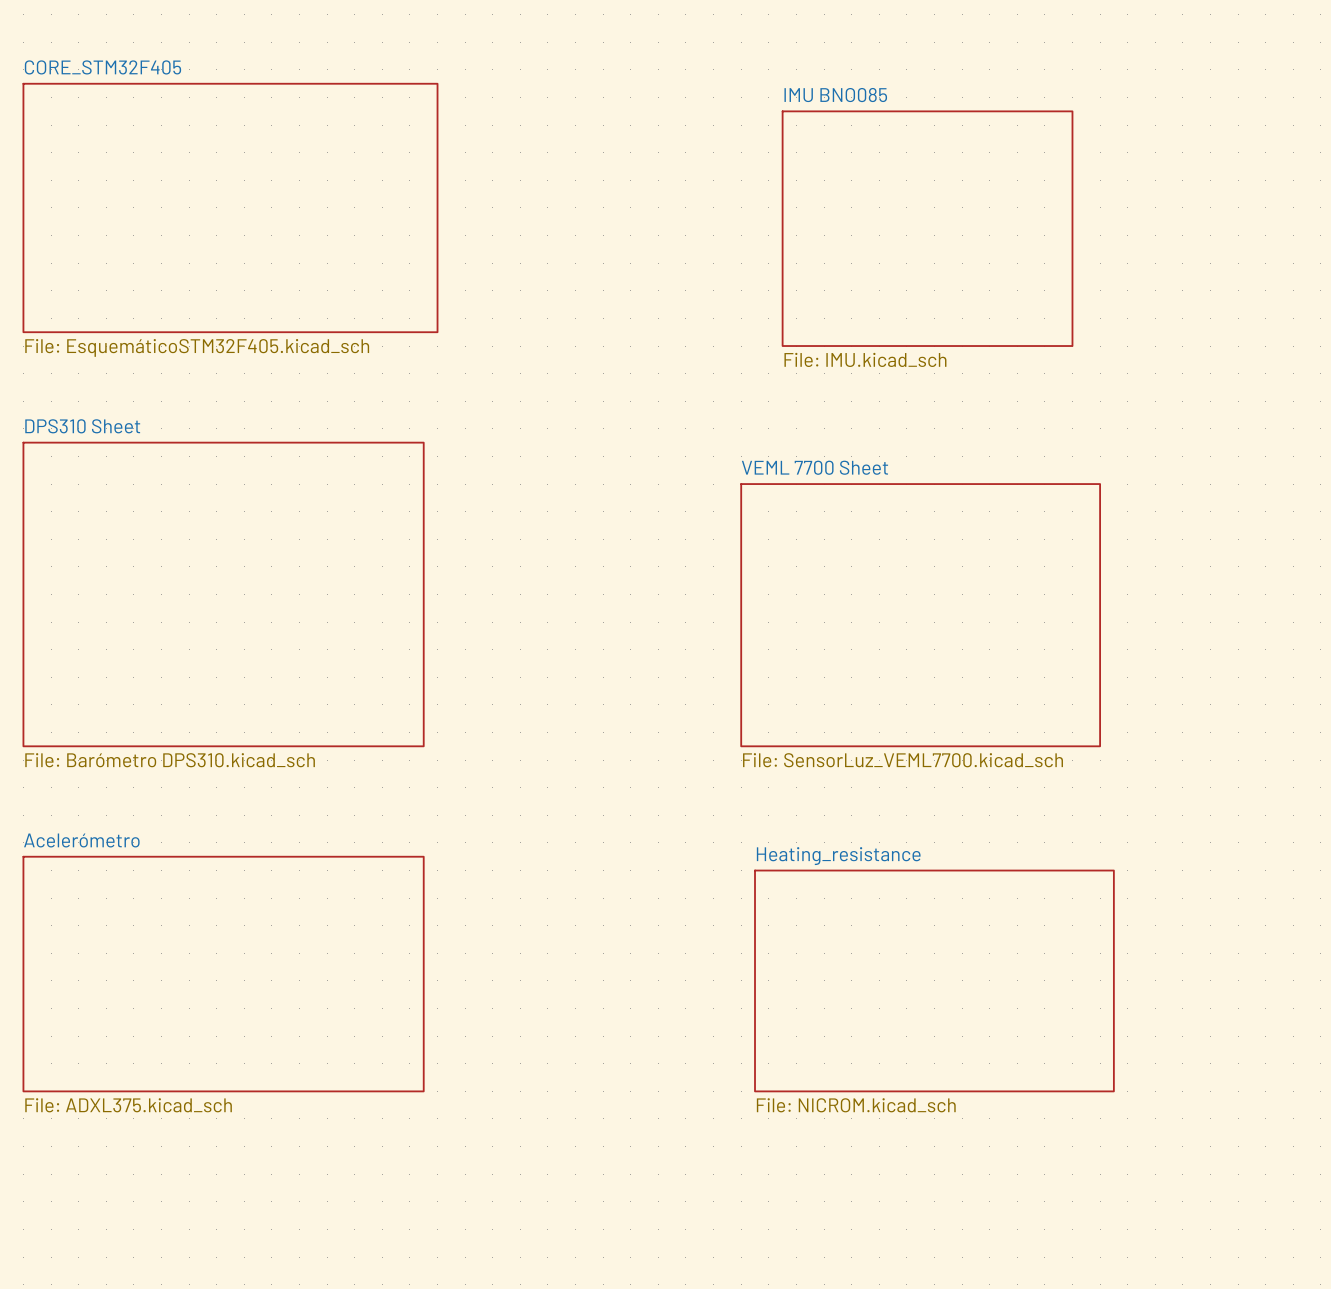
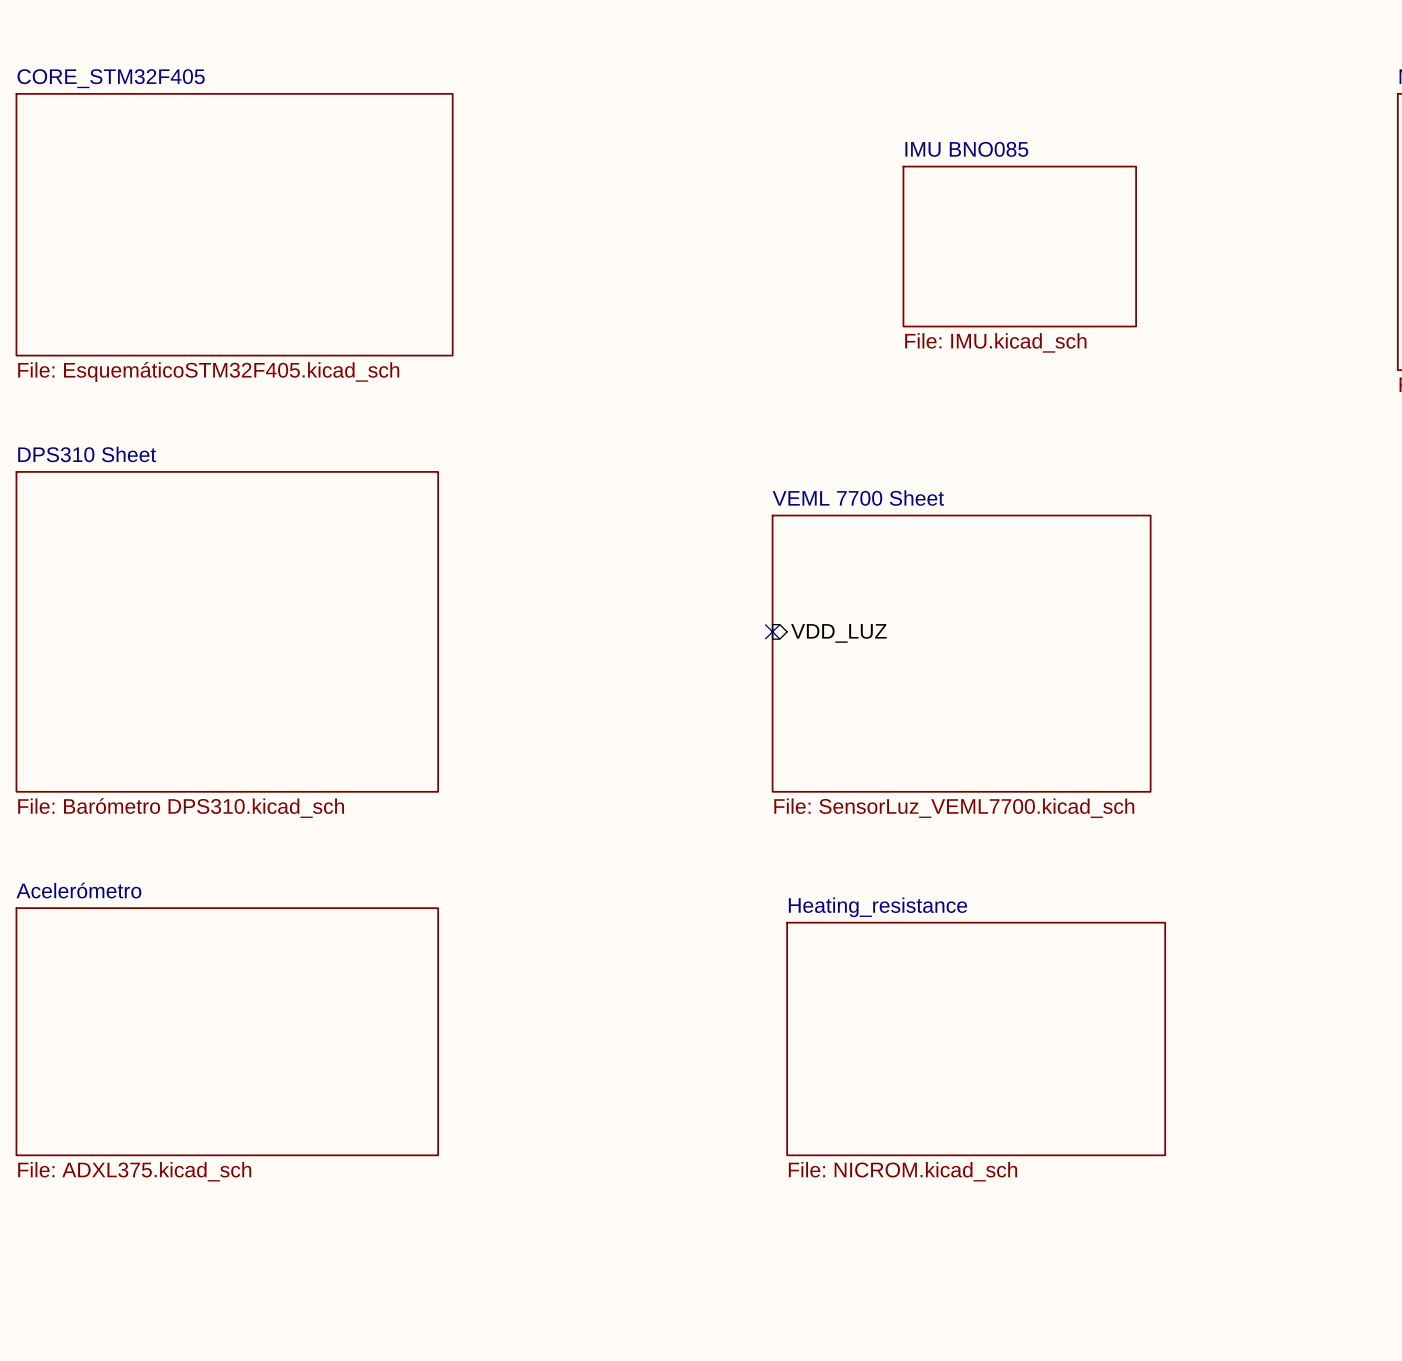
sheet IMU BNO085 name position: IMU BNO085 (835, 95) -> IMU BNO085 (966, 149)
sheet IMU BNO085 shape: [781, 110, 1074, 347] -> [902, 165, 1137, 328]
sheet IMU BNO085 value position: File: IMU.kicad_sch (865, 359) -> File: IMU.kicad_sch (995, 342)
no-connect mark: none -> (772, 631)
sheet pin: none -> VDD_LUZ (838, 633)

